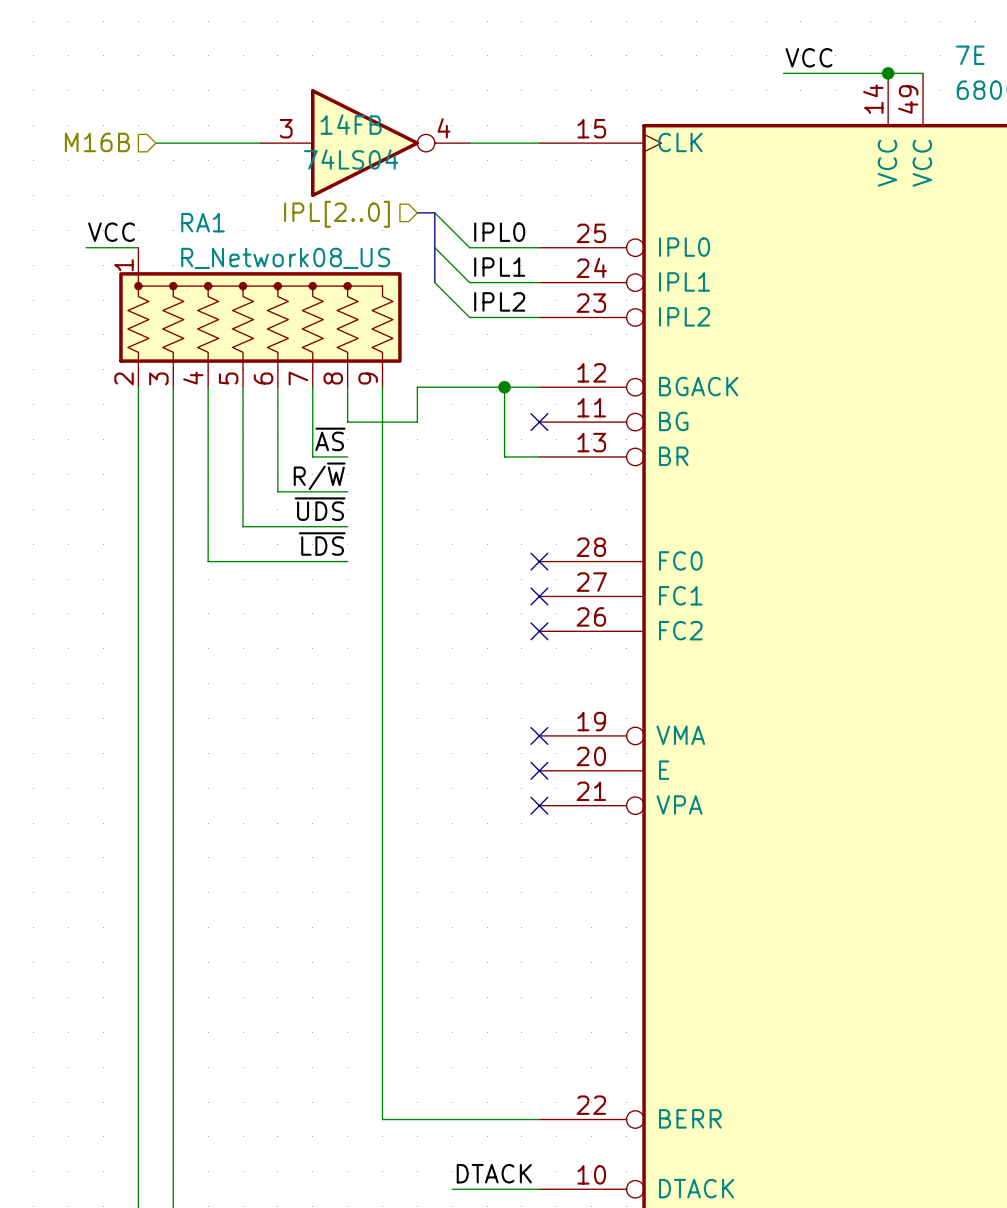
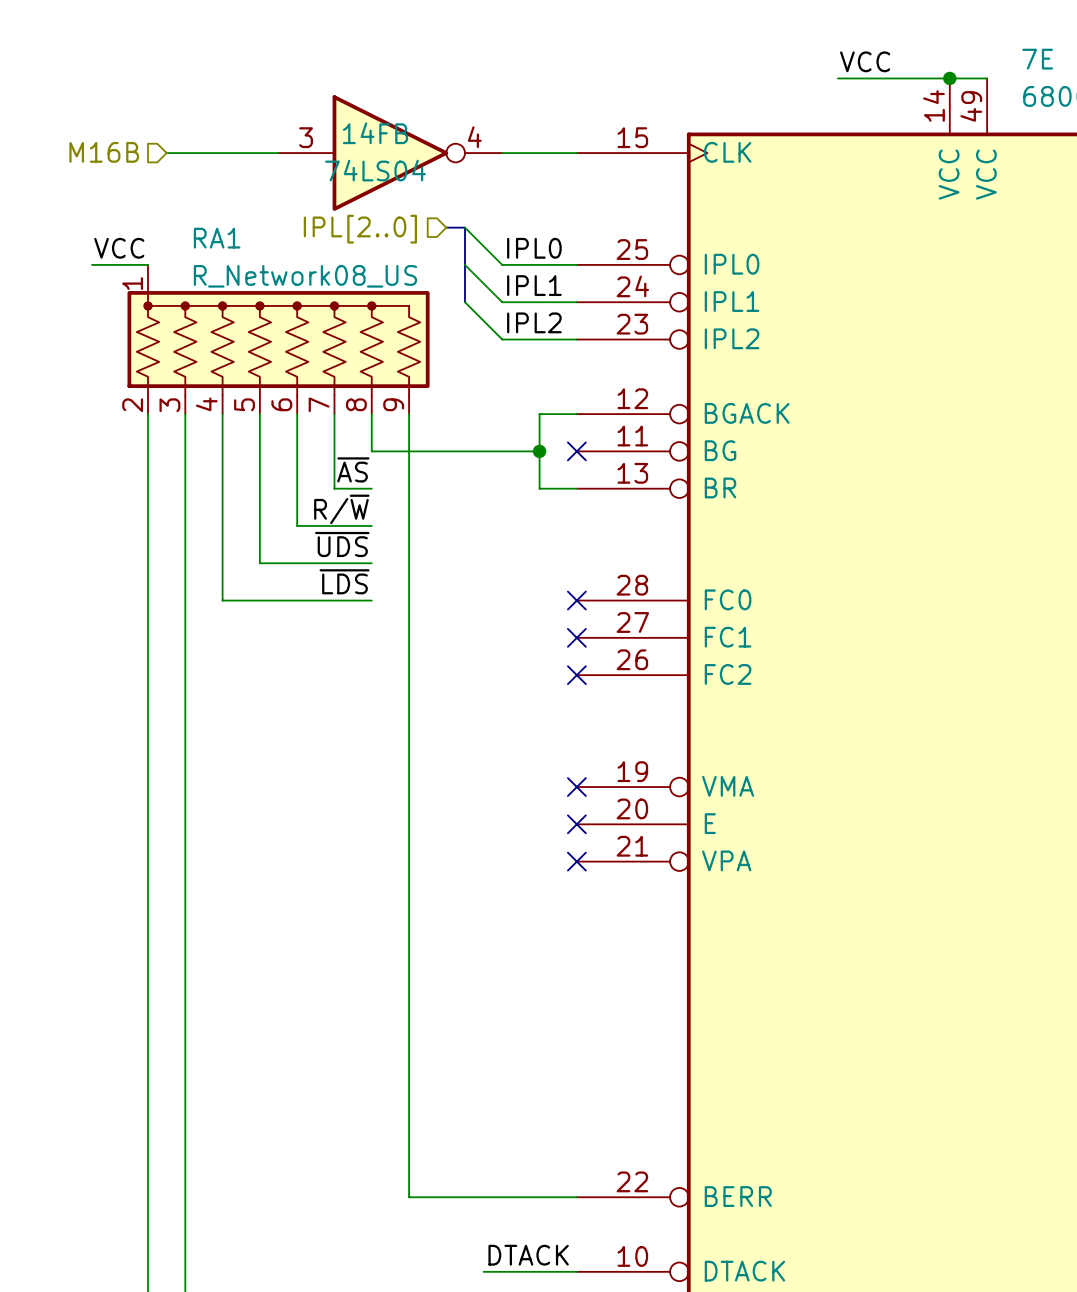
wire: (504, 387) (417, 387) (417, 422) -> (539, 451) (446, 451)
junction position: (504, 387) -> (539, 451)

